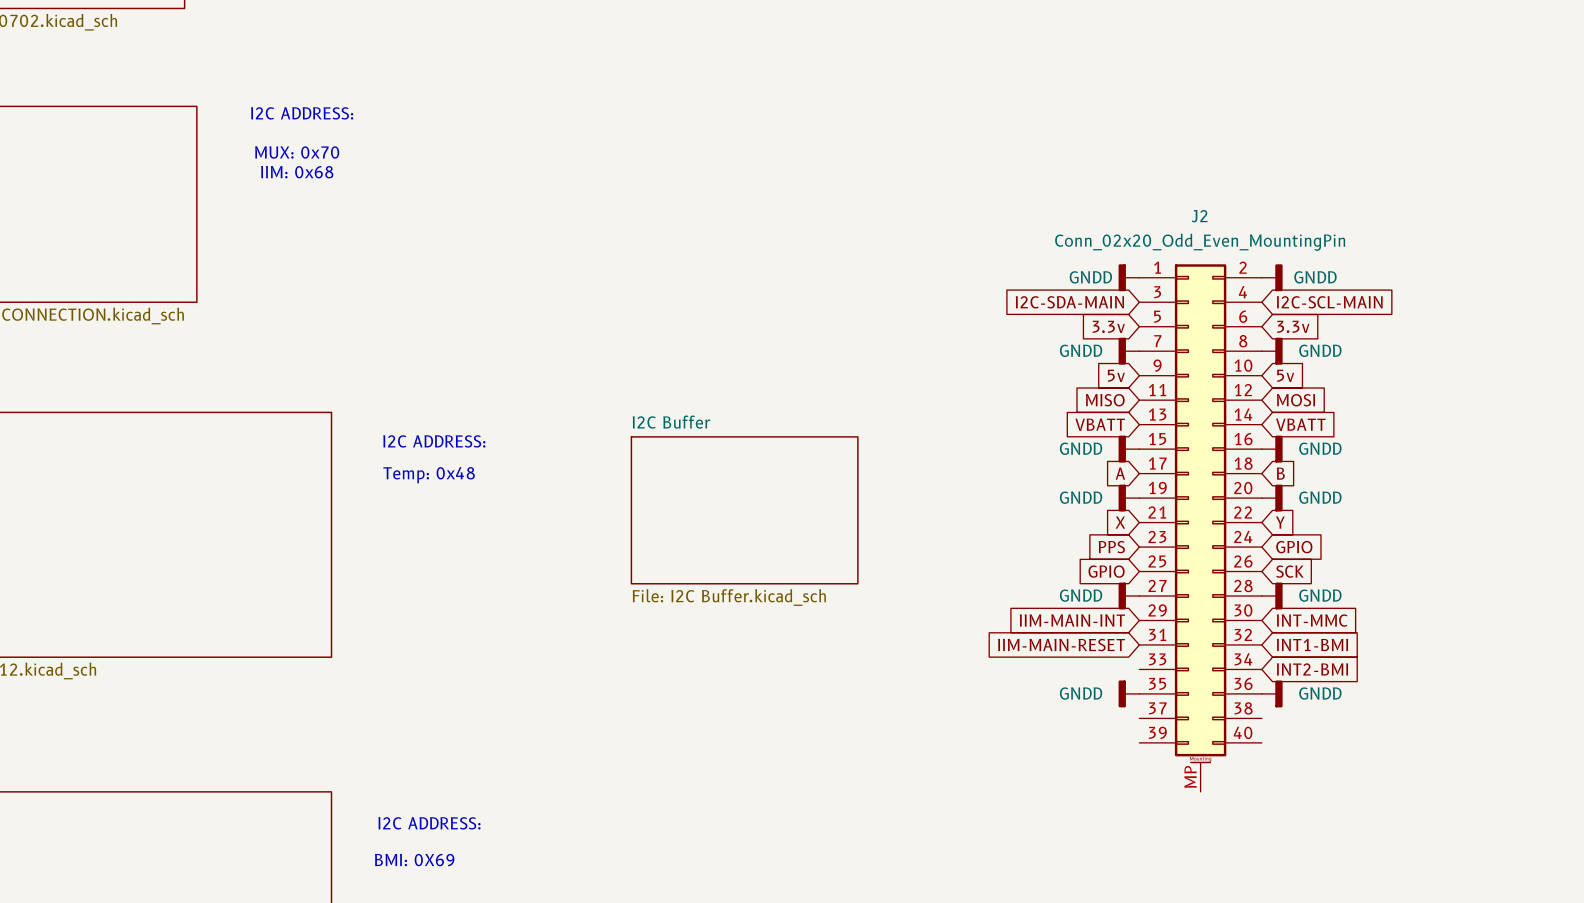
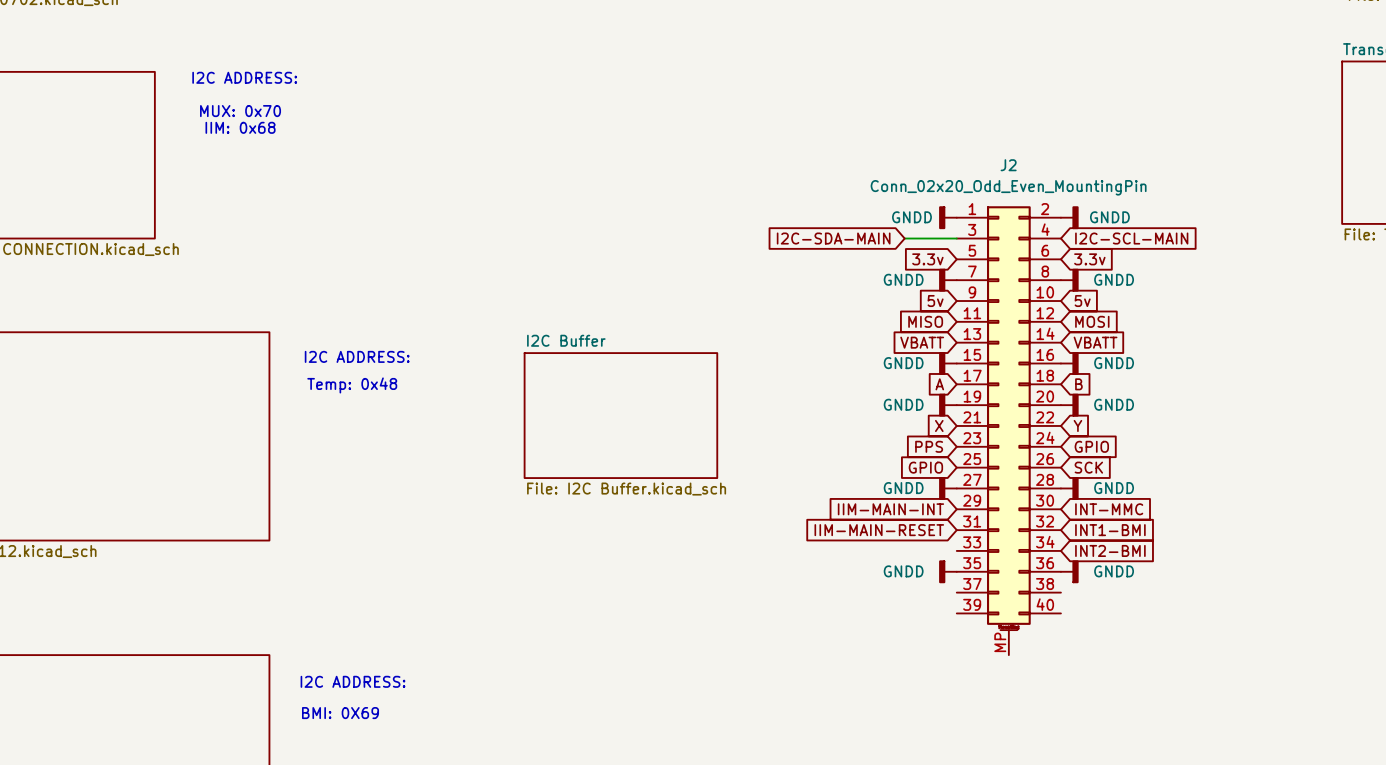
global label position: I2C-SDA-MAIN (1069, 302) -> I2C-SDA-MAIN (833, 238)
wire: none -> (904, 238) (956, 238)

